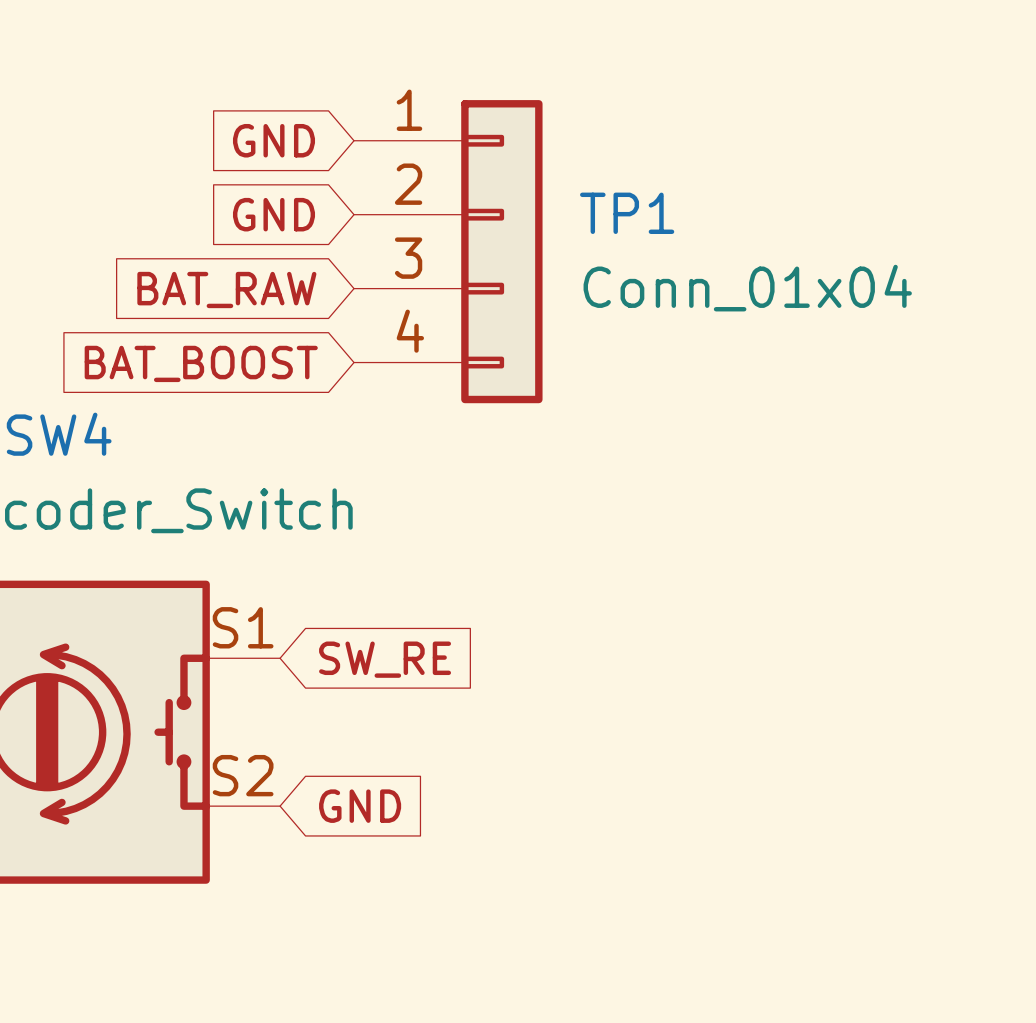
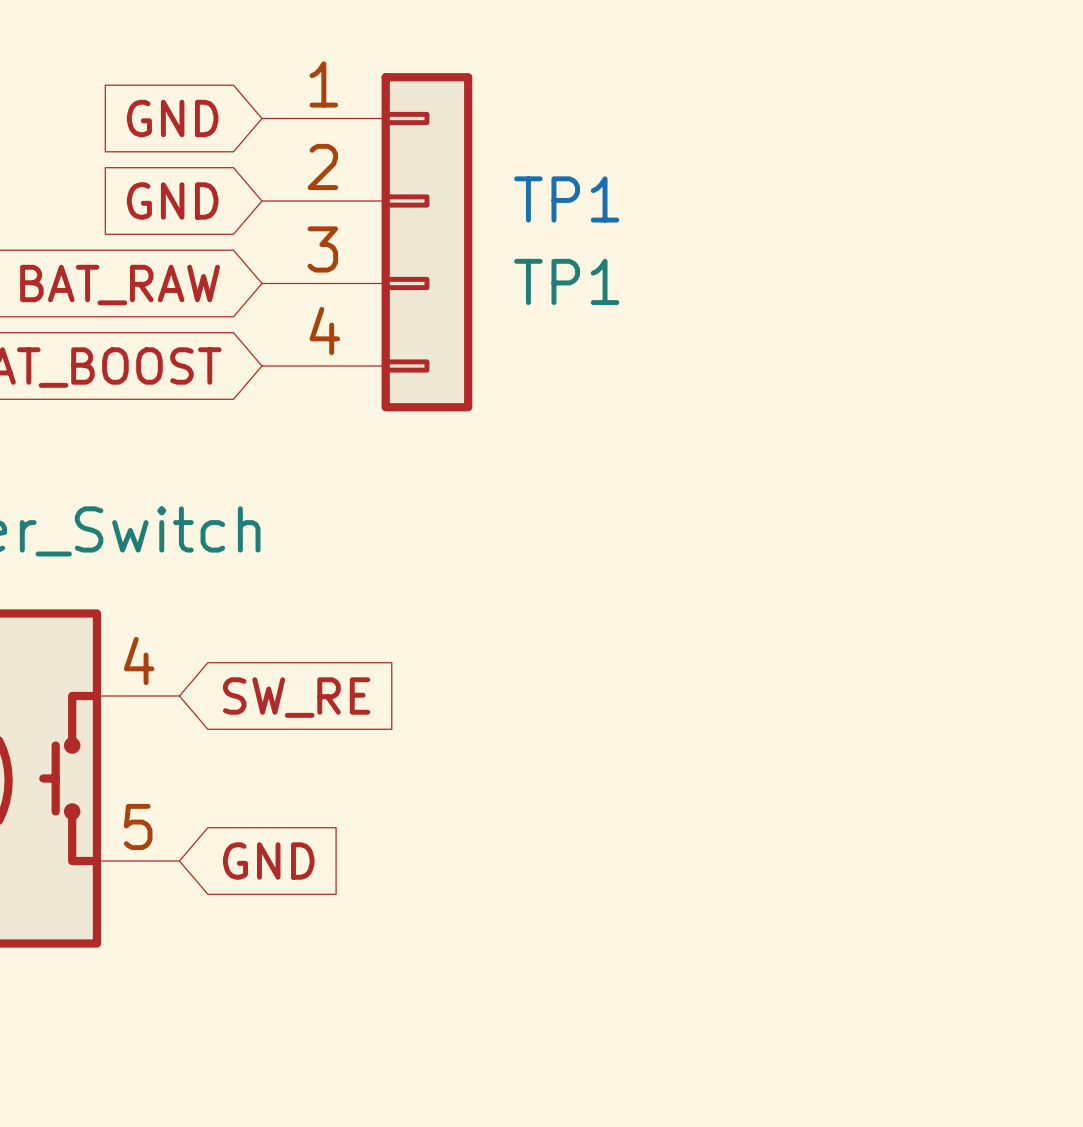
TP1 value: Conn_01x04 (747, 288) -> TP1 (566, 281)
SW4 pin number: S1 (243, 627) -> 4 (139, 660)
SW4 pin number: S2 (243, 775) -> 5 (138, 826)

